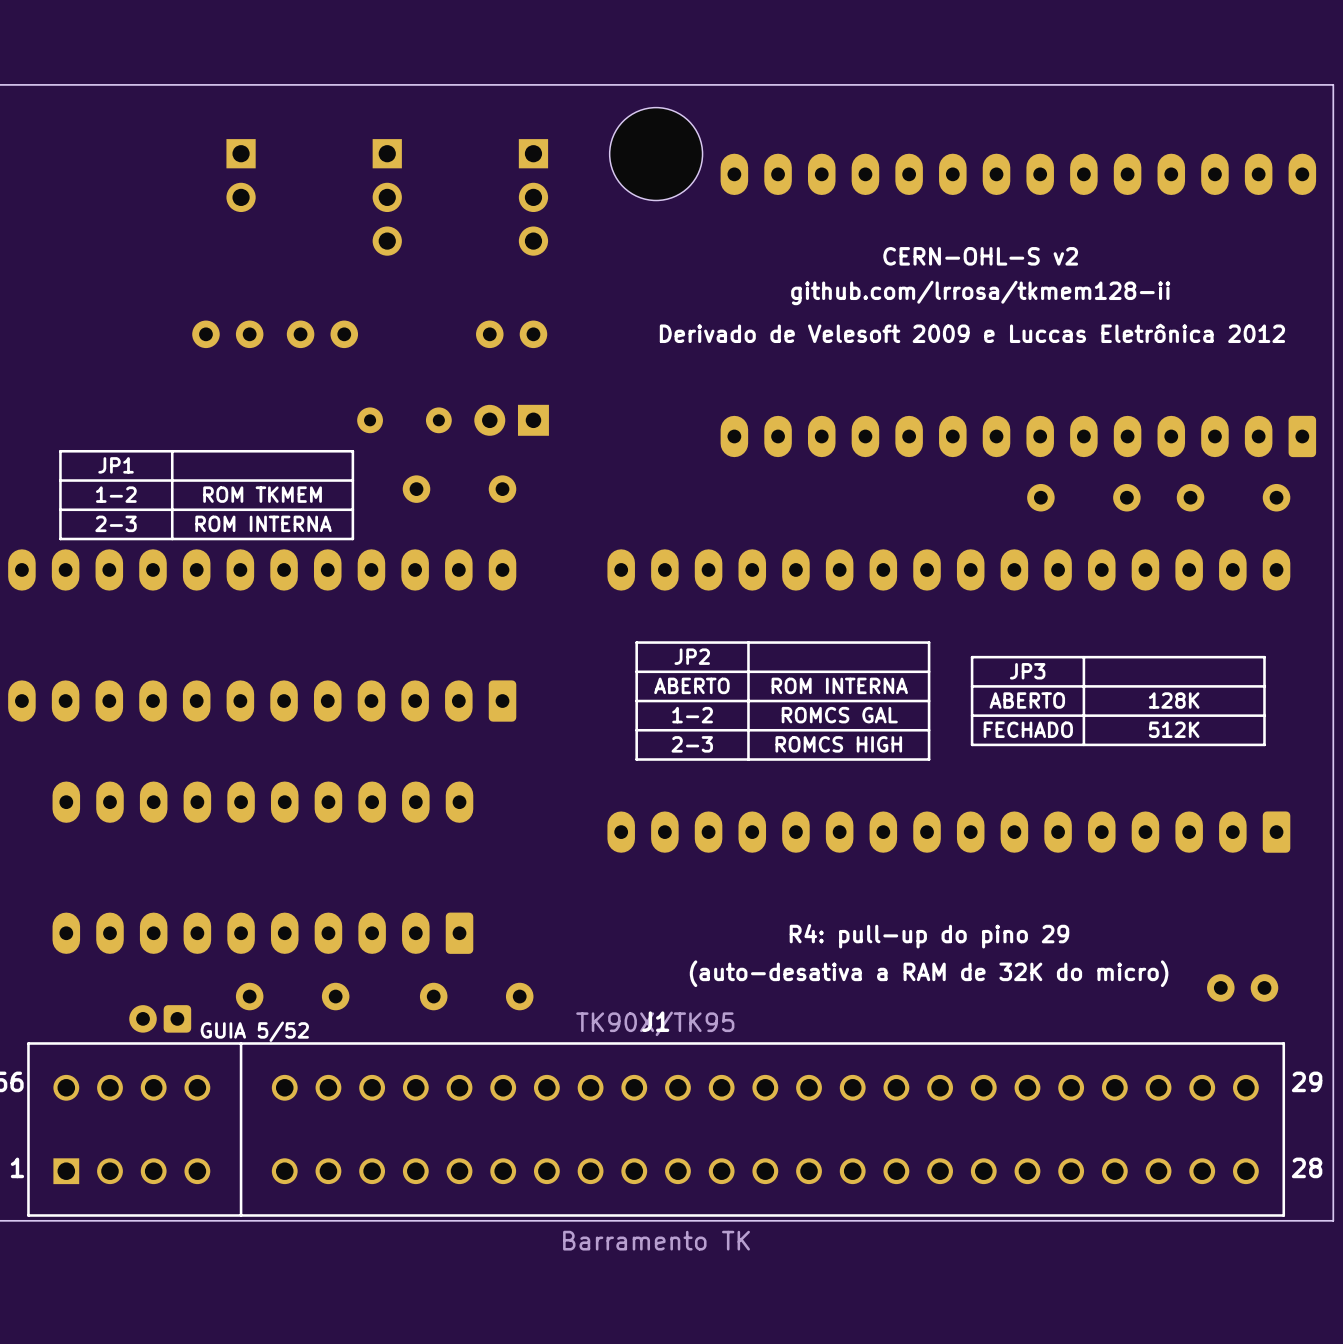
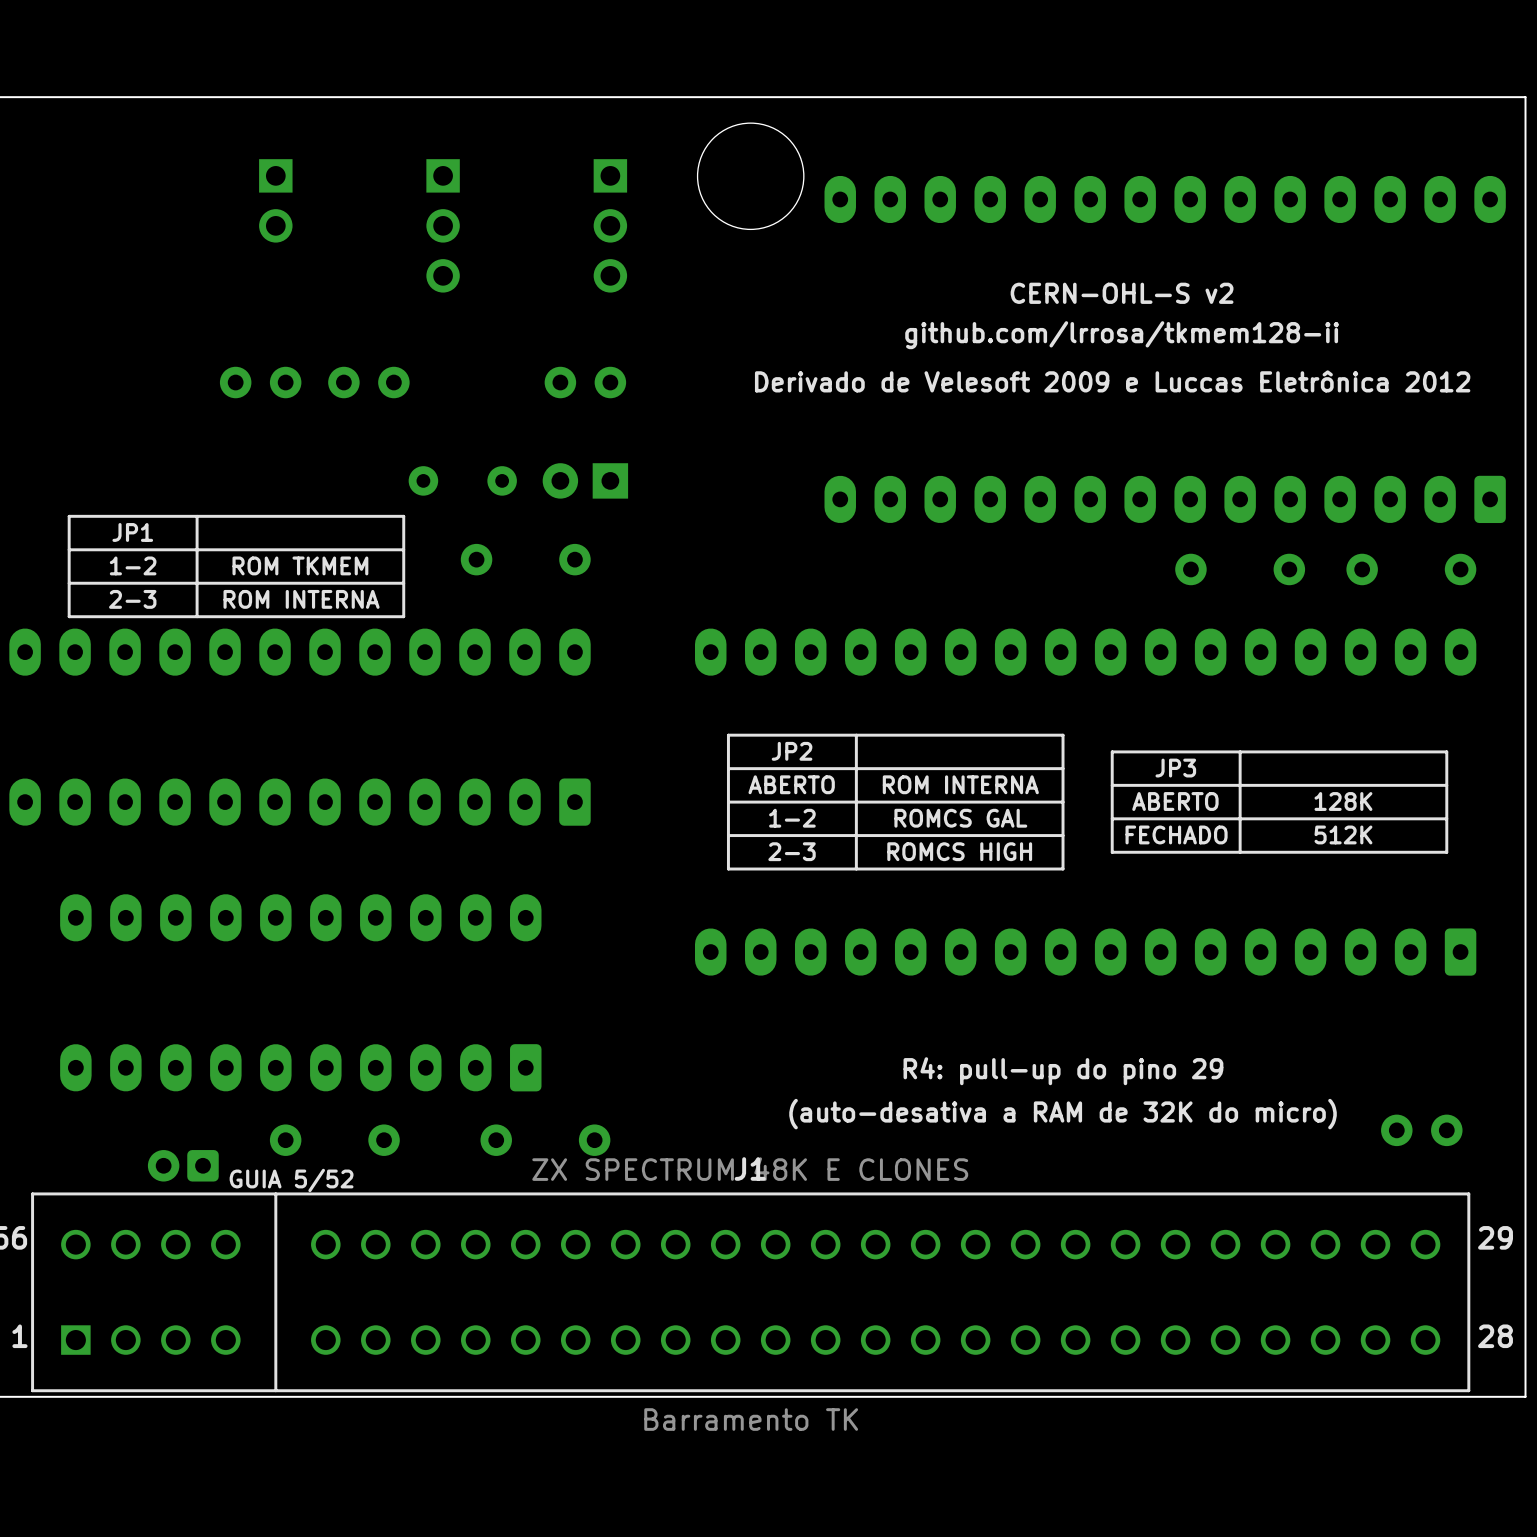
J1 text: TK90X/TK95 (655, 1023) -> ZX SPECTRUM 48K E CLONES (750, 1169)

